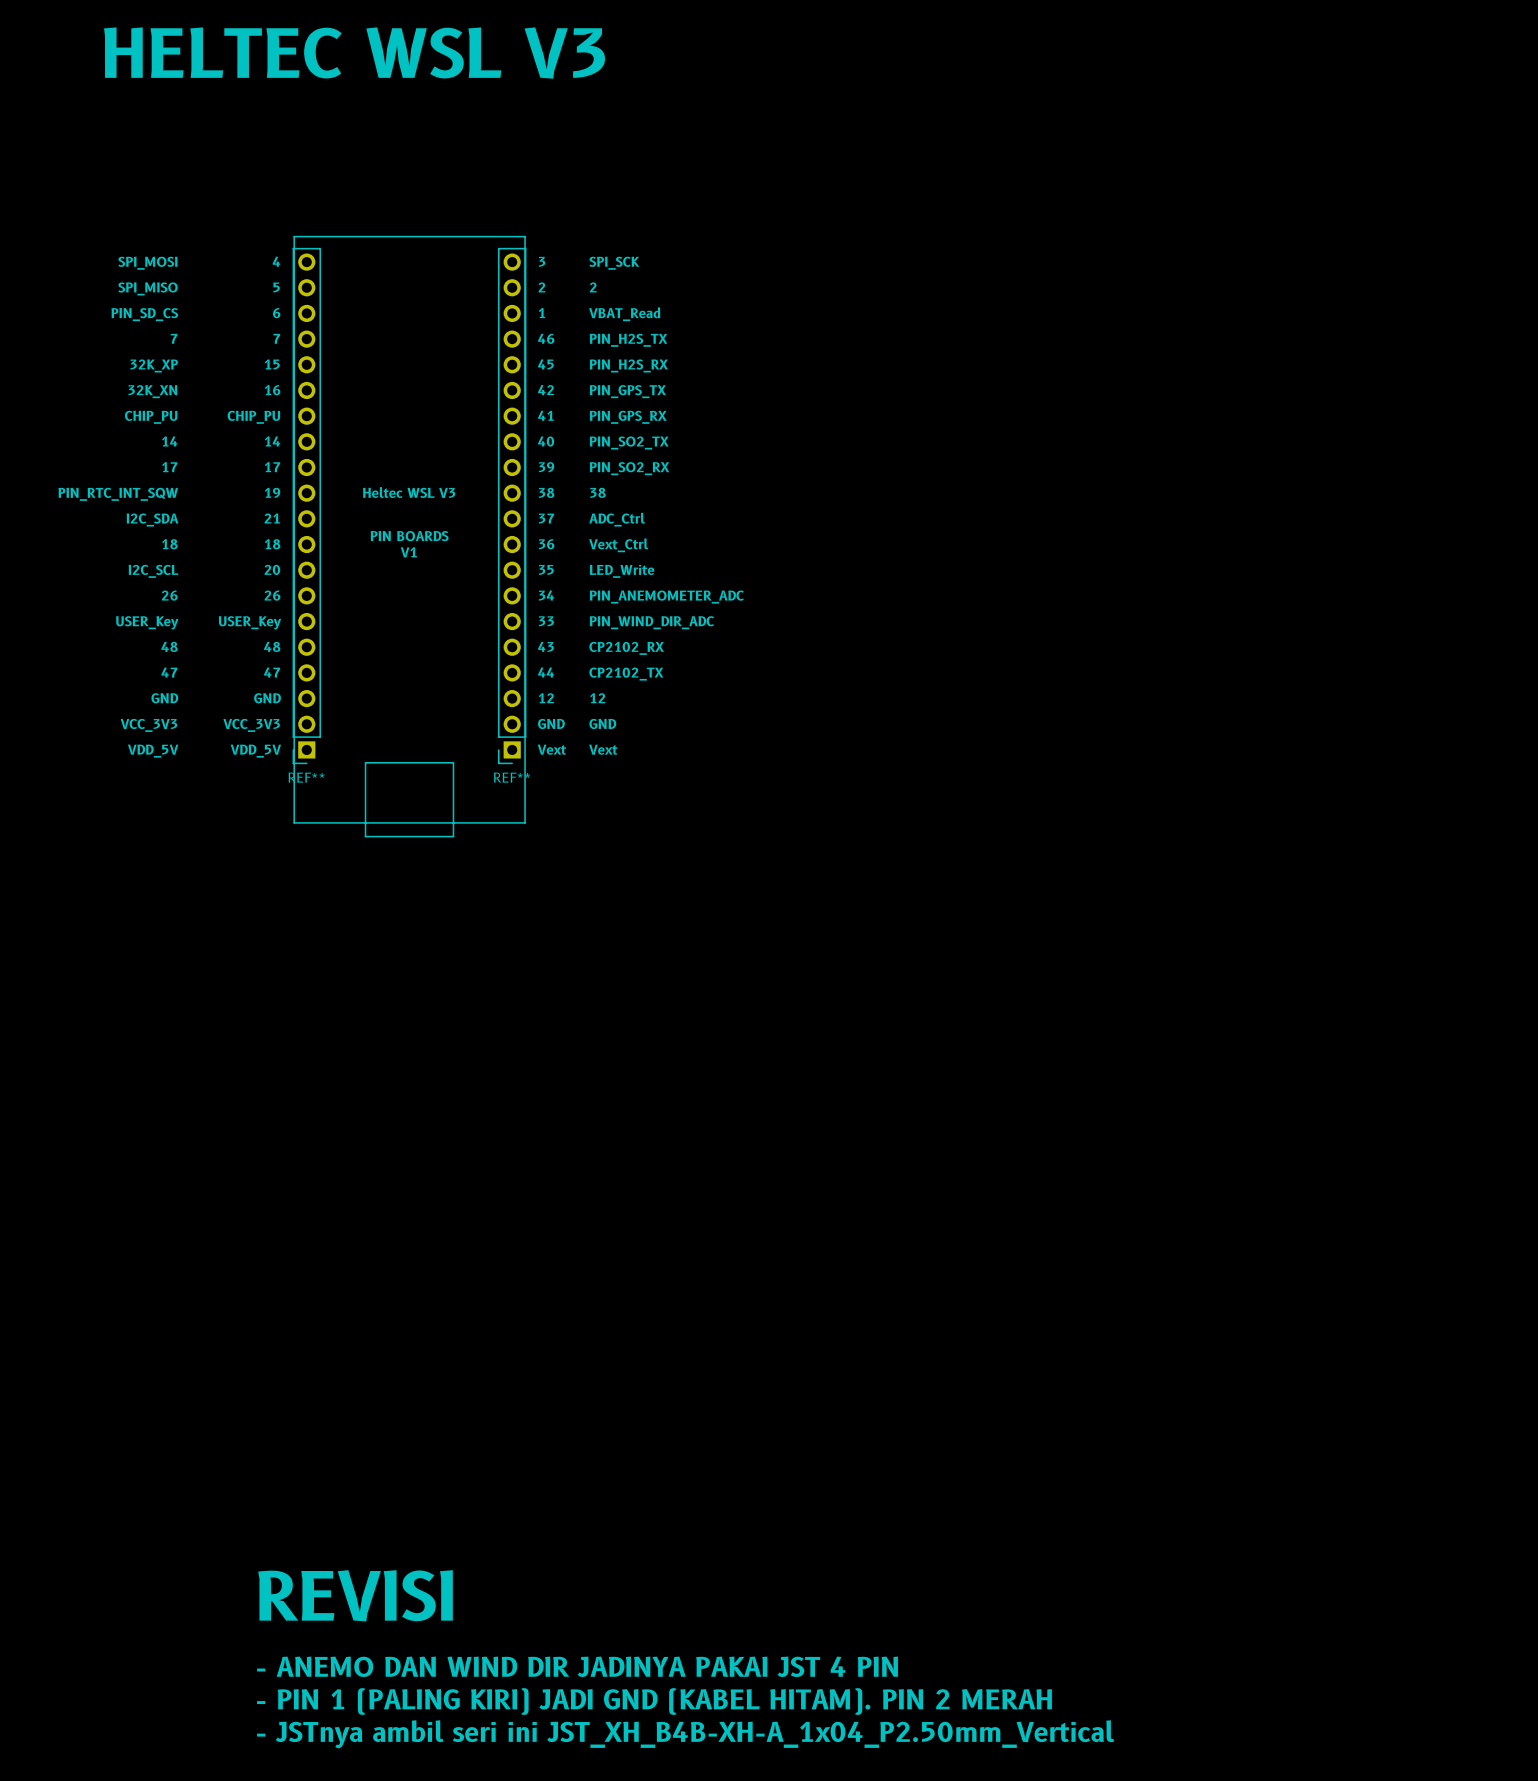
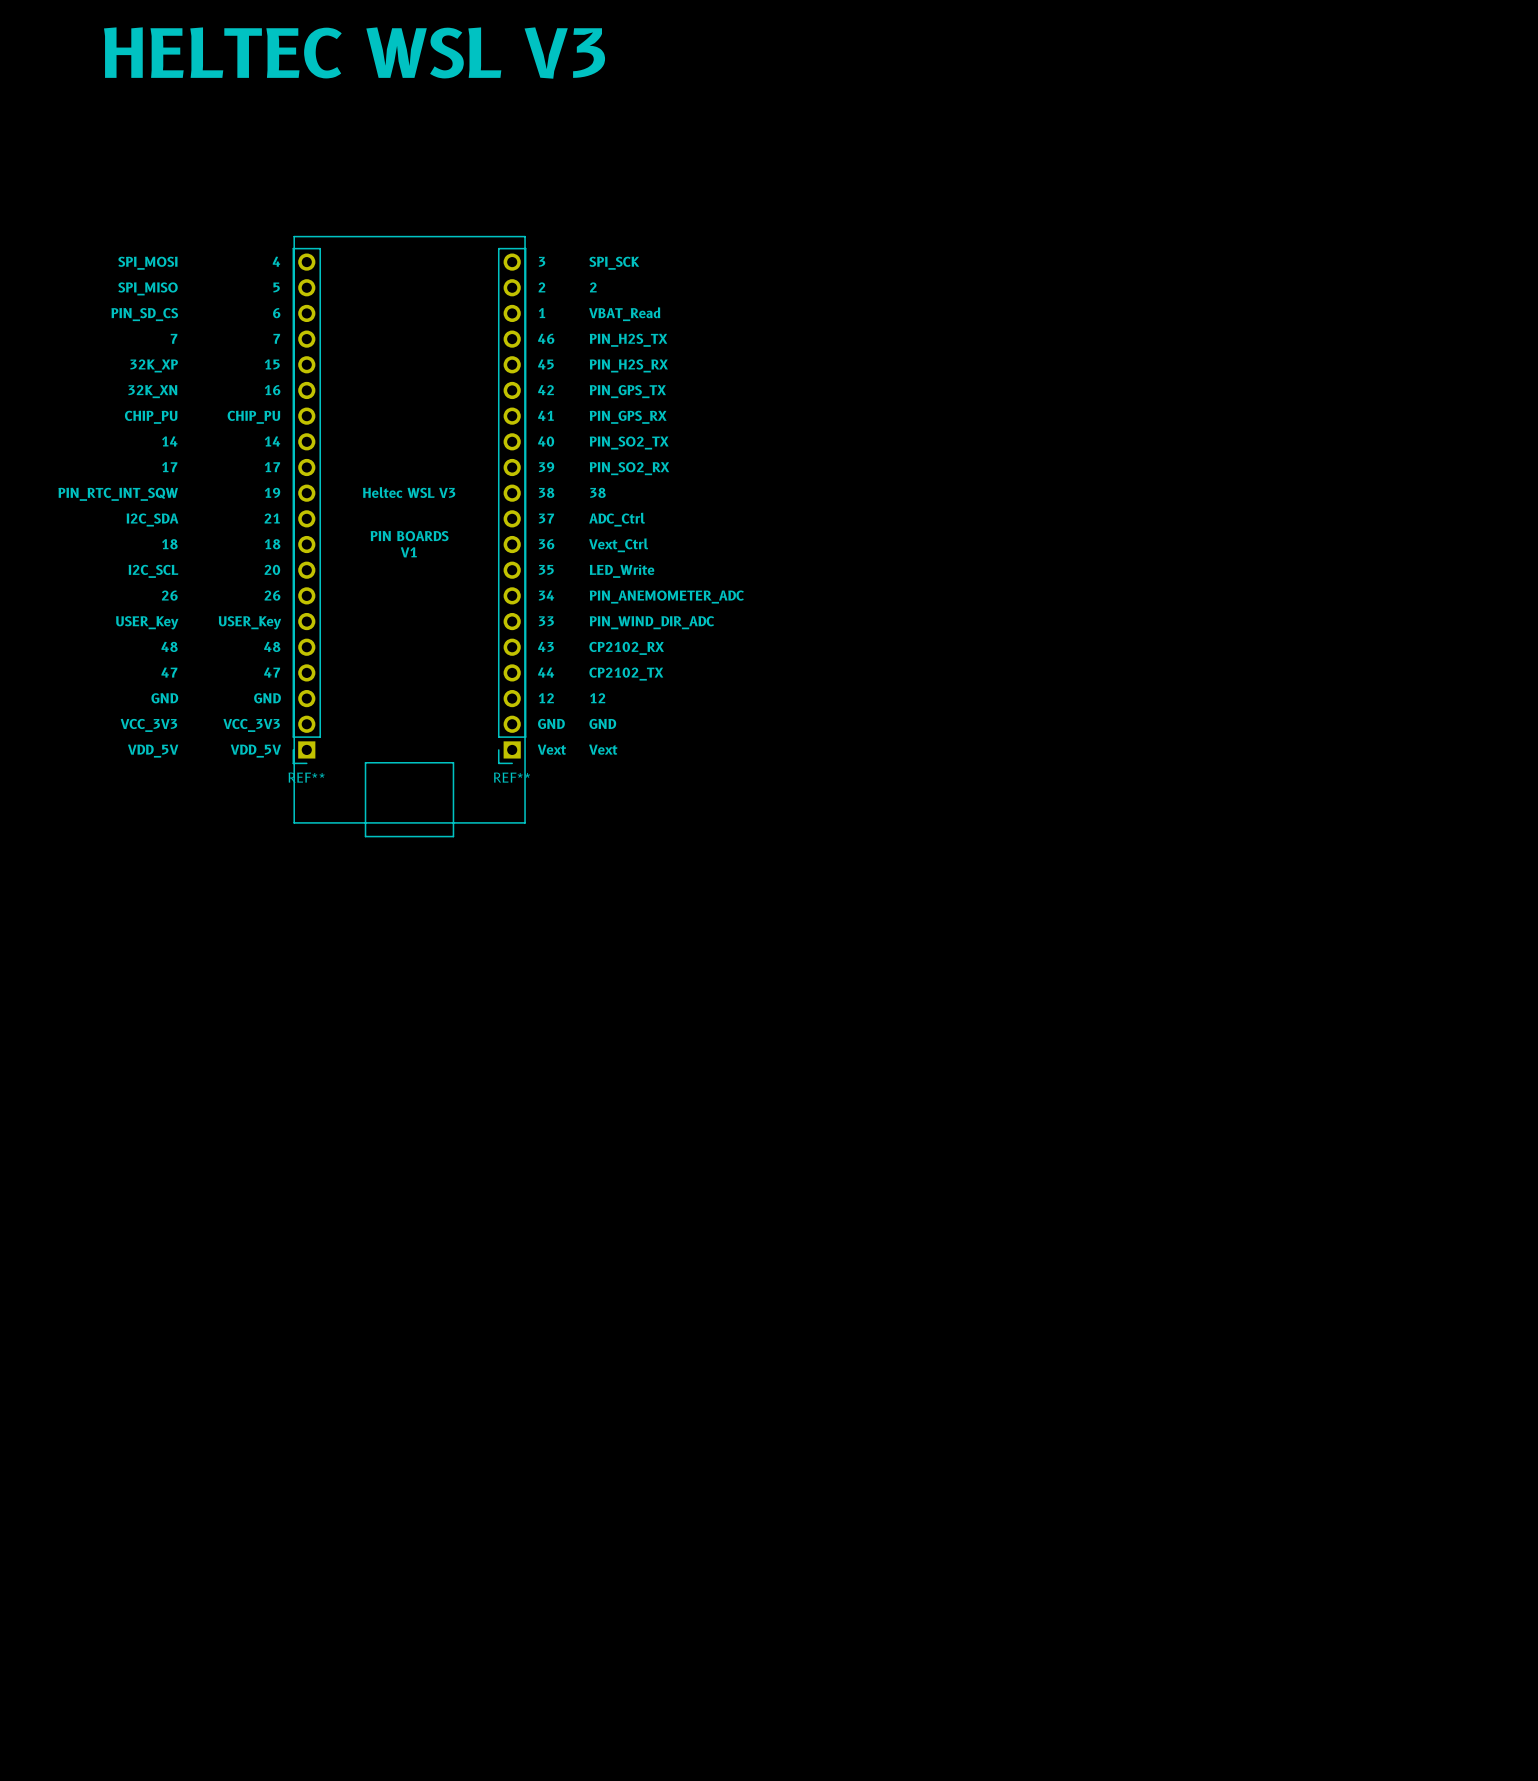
text: REVISI (355, 1595) -> none
text: - ANEMO DAN WIND DIR JADINYA PAKAI JST 4 PIN (577, 1666) -> none
text: - PIN 1 (PALING KIRI) JADI GND (KABEL HITAM). PIN 2 MERAH (654, 1701) -> none
text: - JSTnya ambil seri ini JST_XH_B4B-XH-A_1x04_P2.50mm_Vertical (685, 1734) -> none

